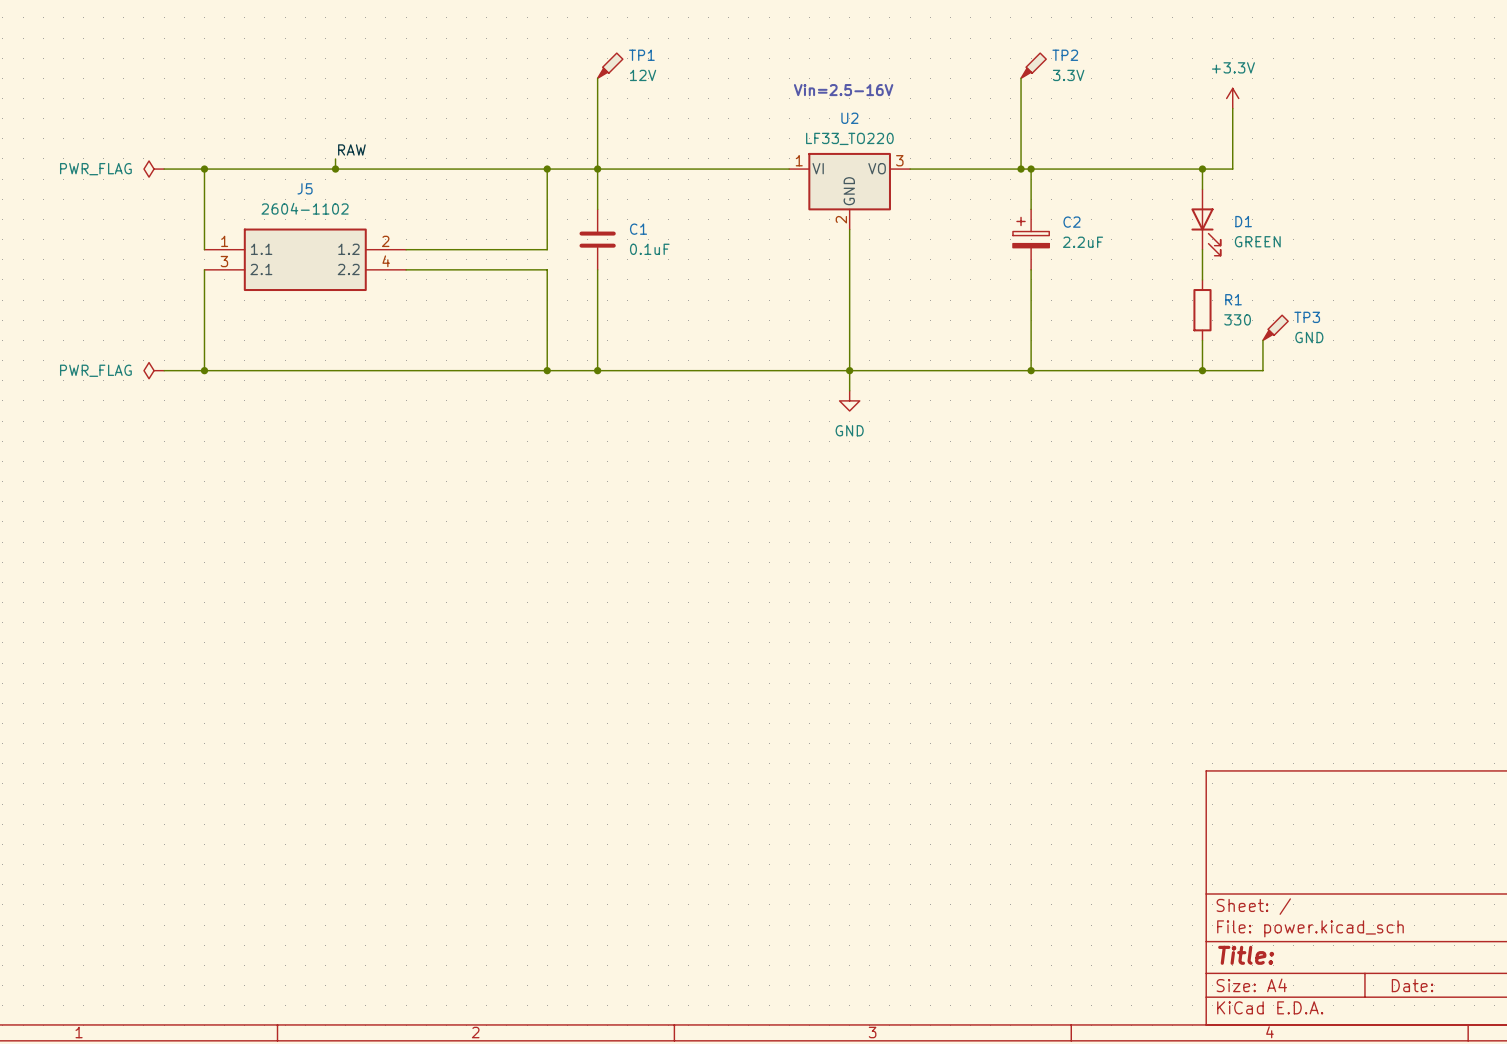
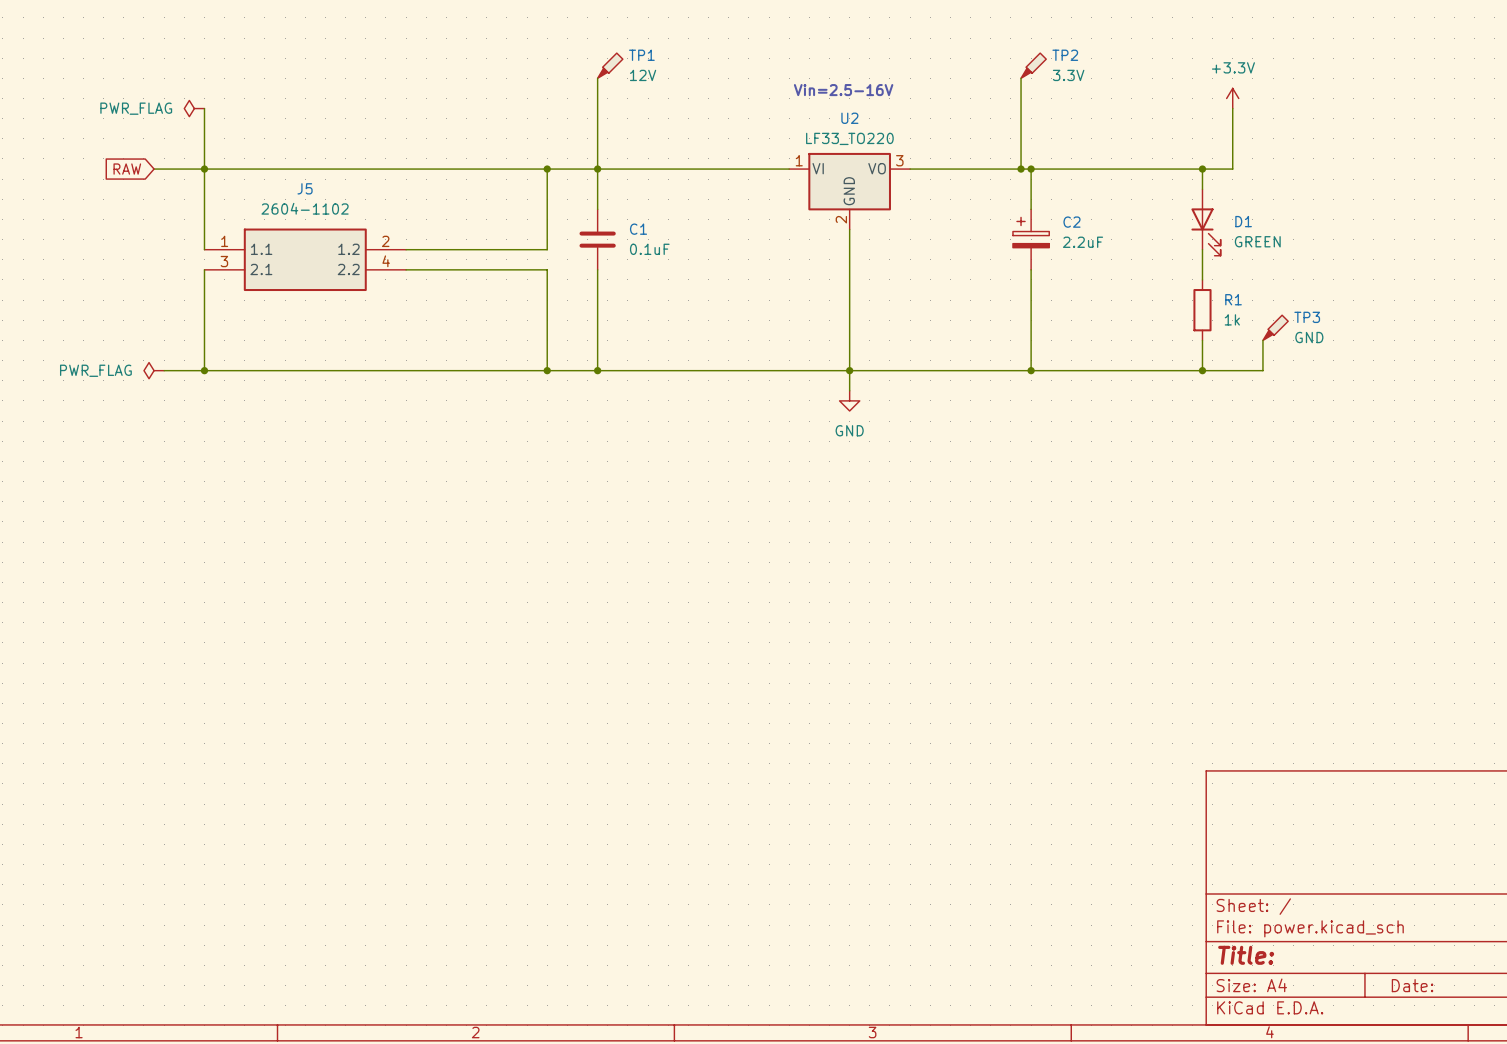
wire: none -> (204, 108) (204, 169)
label: RAW (351, 149) -> none
wire: (335, 158) (335, 169) -> none
global label: none -> RAW (127, 169)
power symbol position: PWR_FLAG (154, 169) -> PWR_FLAG (194, 108)
junction: (335, 169) -> none
R1 value: 330 (1237, 319) -> 1k (1232, 319)

